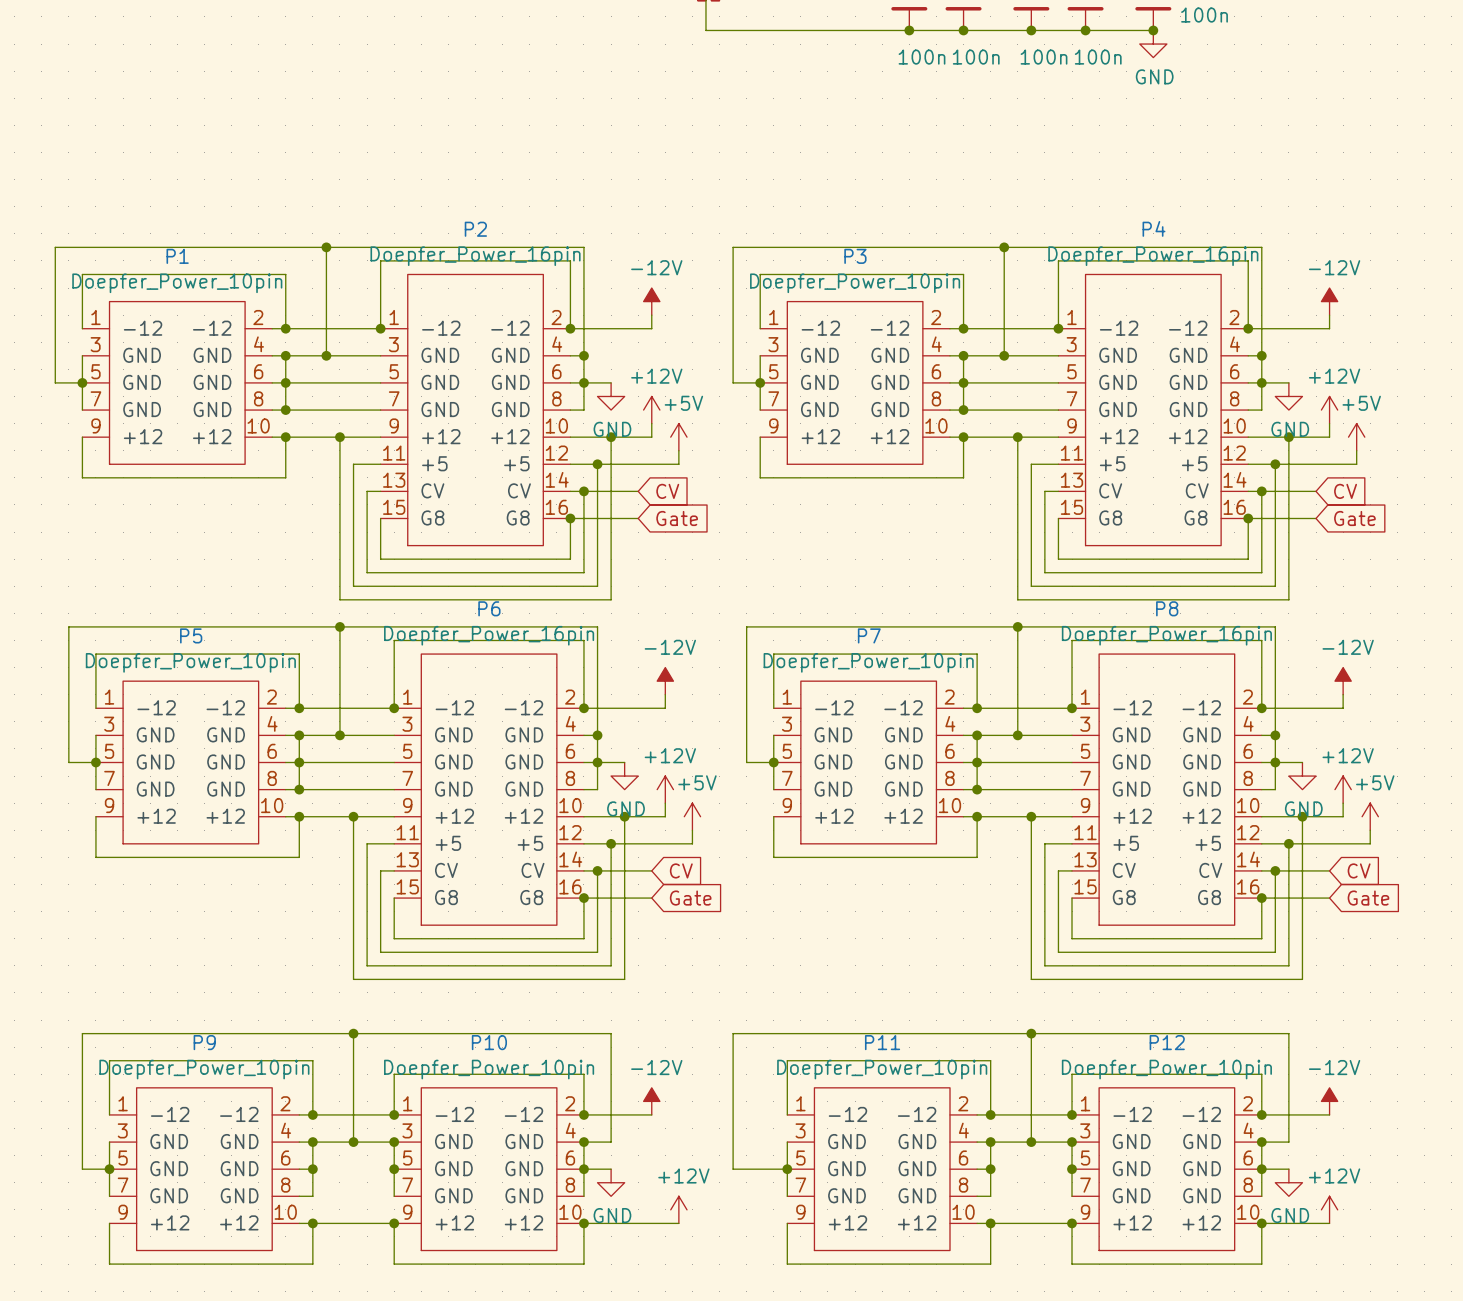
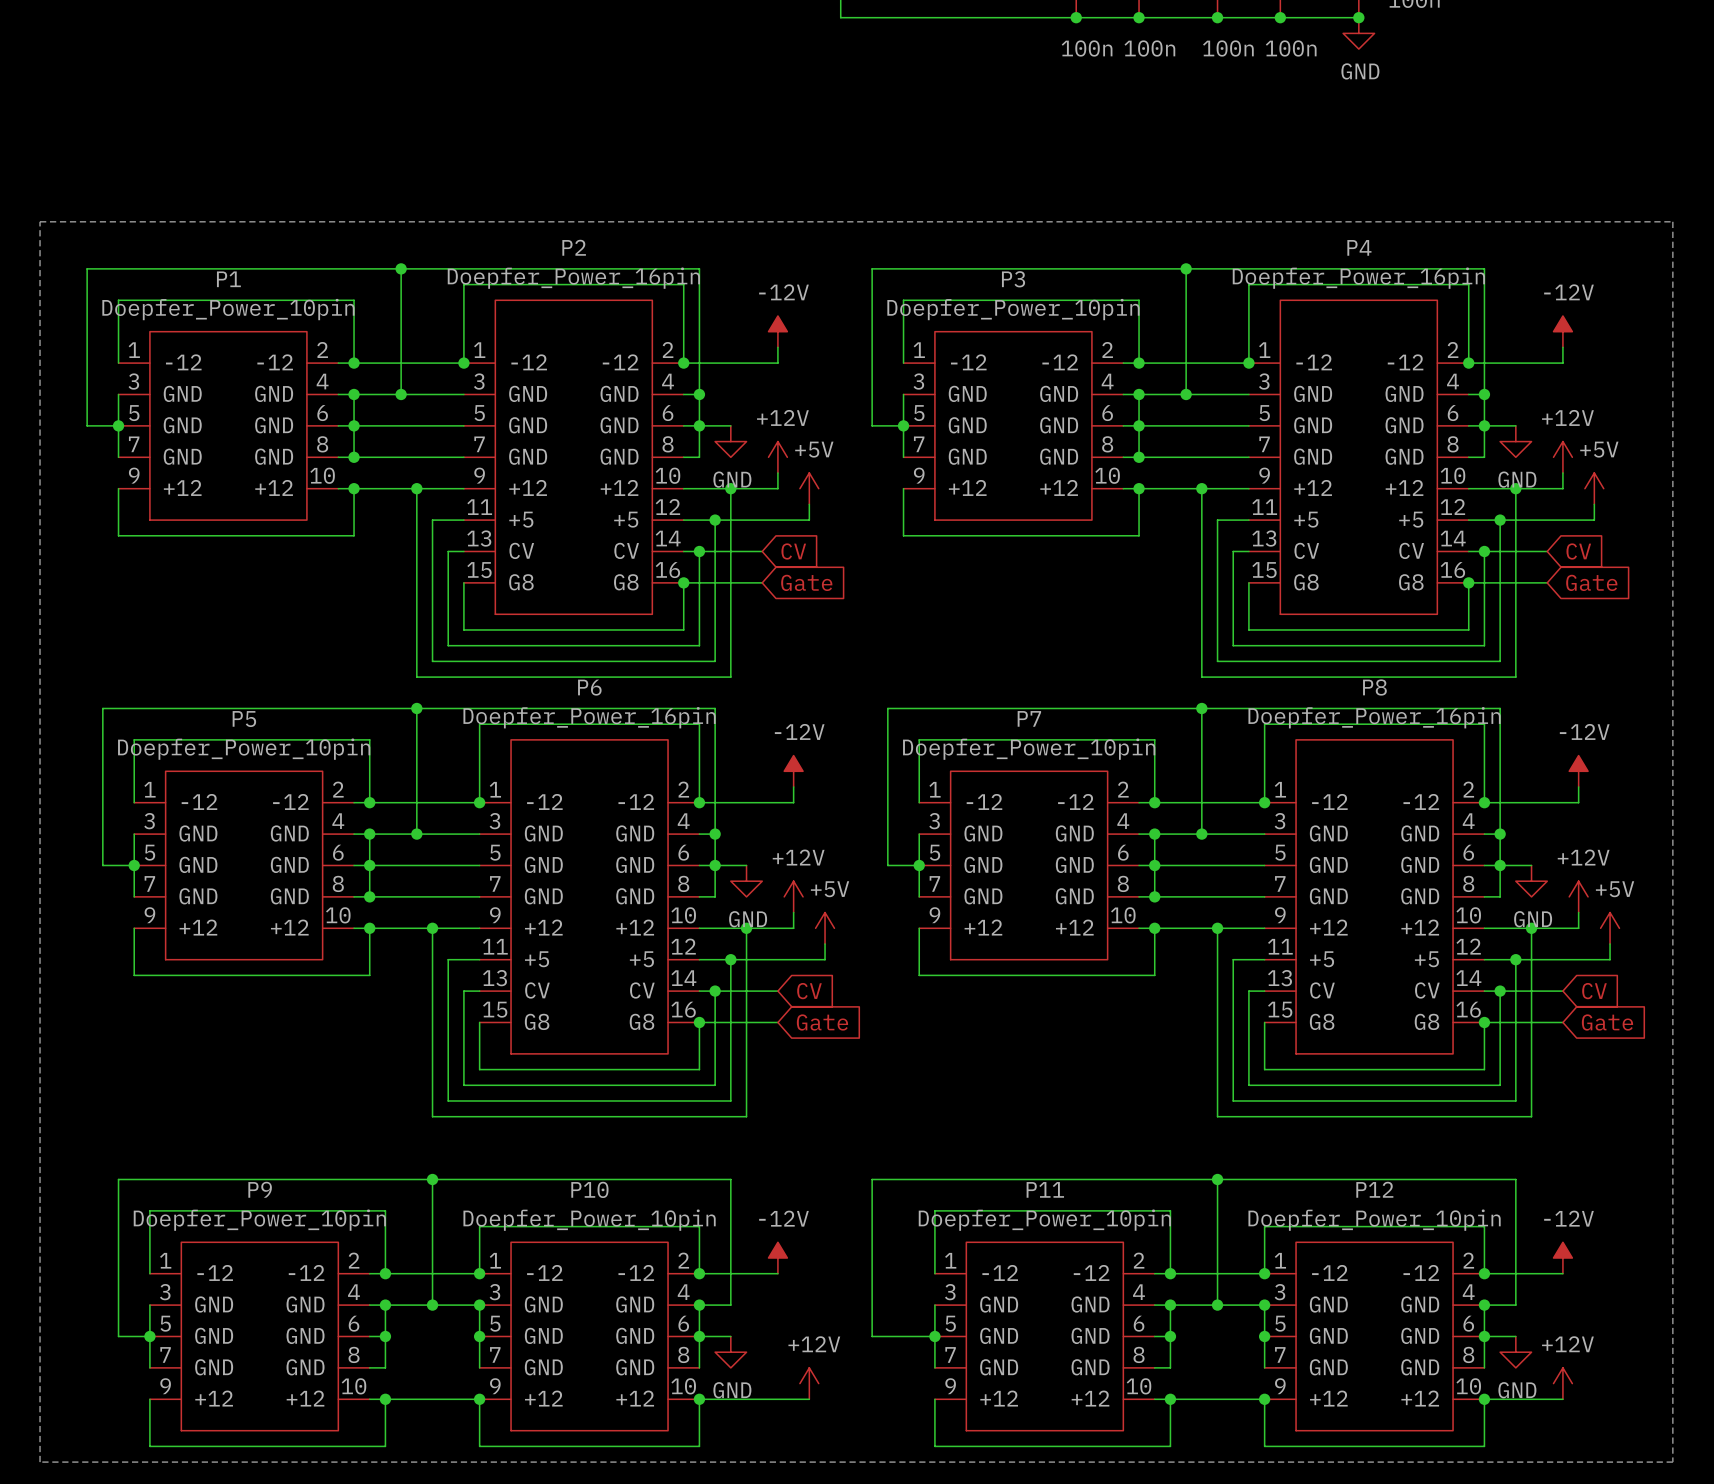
line: none -> (40, 221) (1672, 221) (1672, 1462) (40, 1462) (40, 221)

